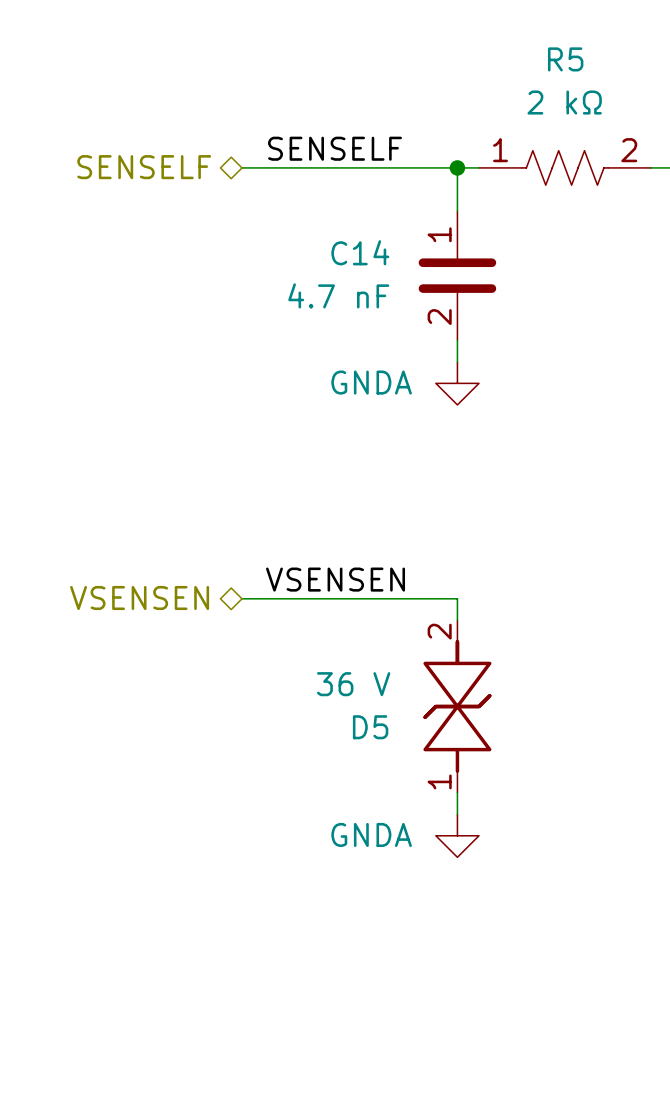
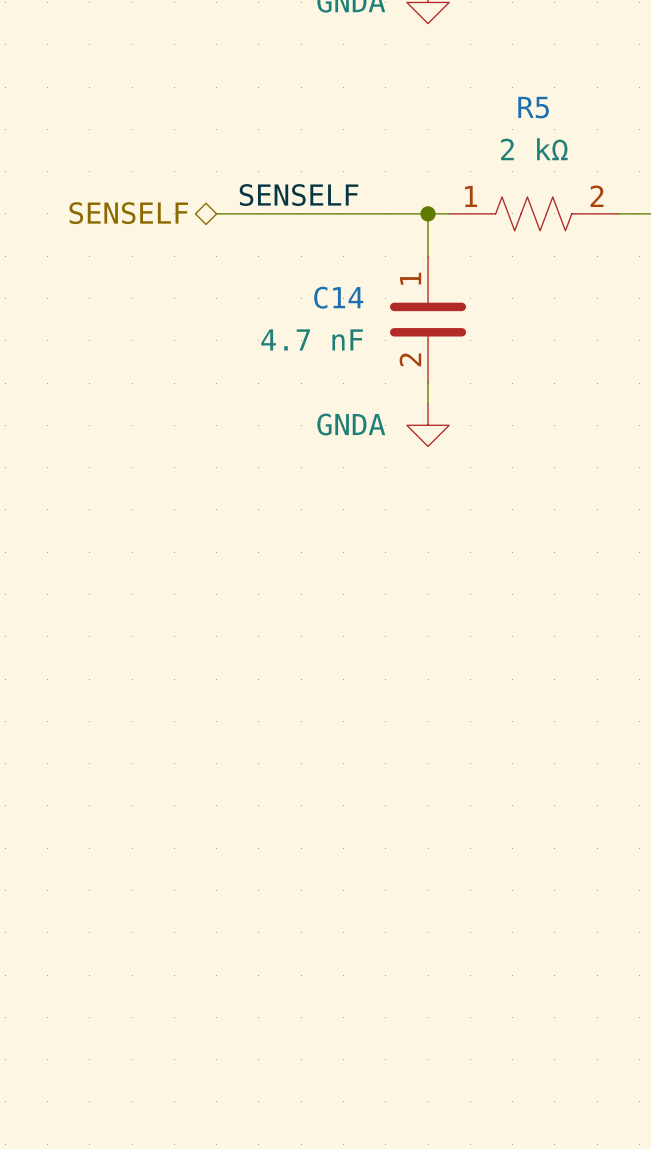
label: VSENSEN (335, 579) -> none
hierarchical label: VSENSEN (139, 598) -> none
wire: (242, 598) (457, 598) (457, 620) -> none
D5: 36 V (457, 706) -> none
wire: (457, 792) (457, 814) -> none
power symbol: GNDA (457, 835) -> none

